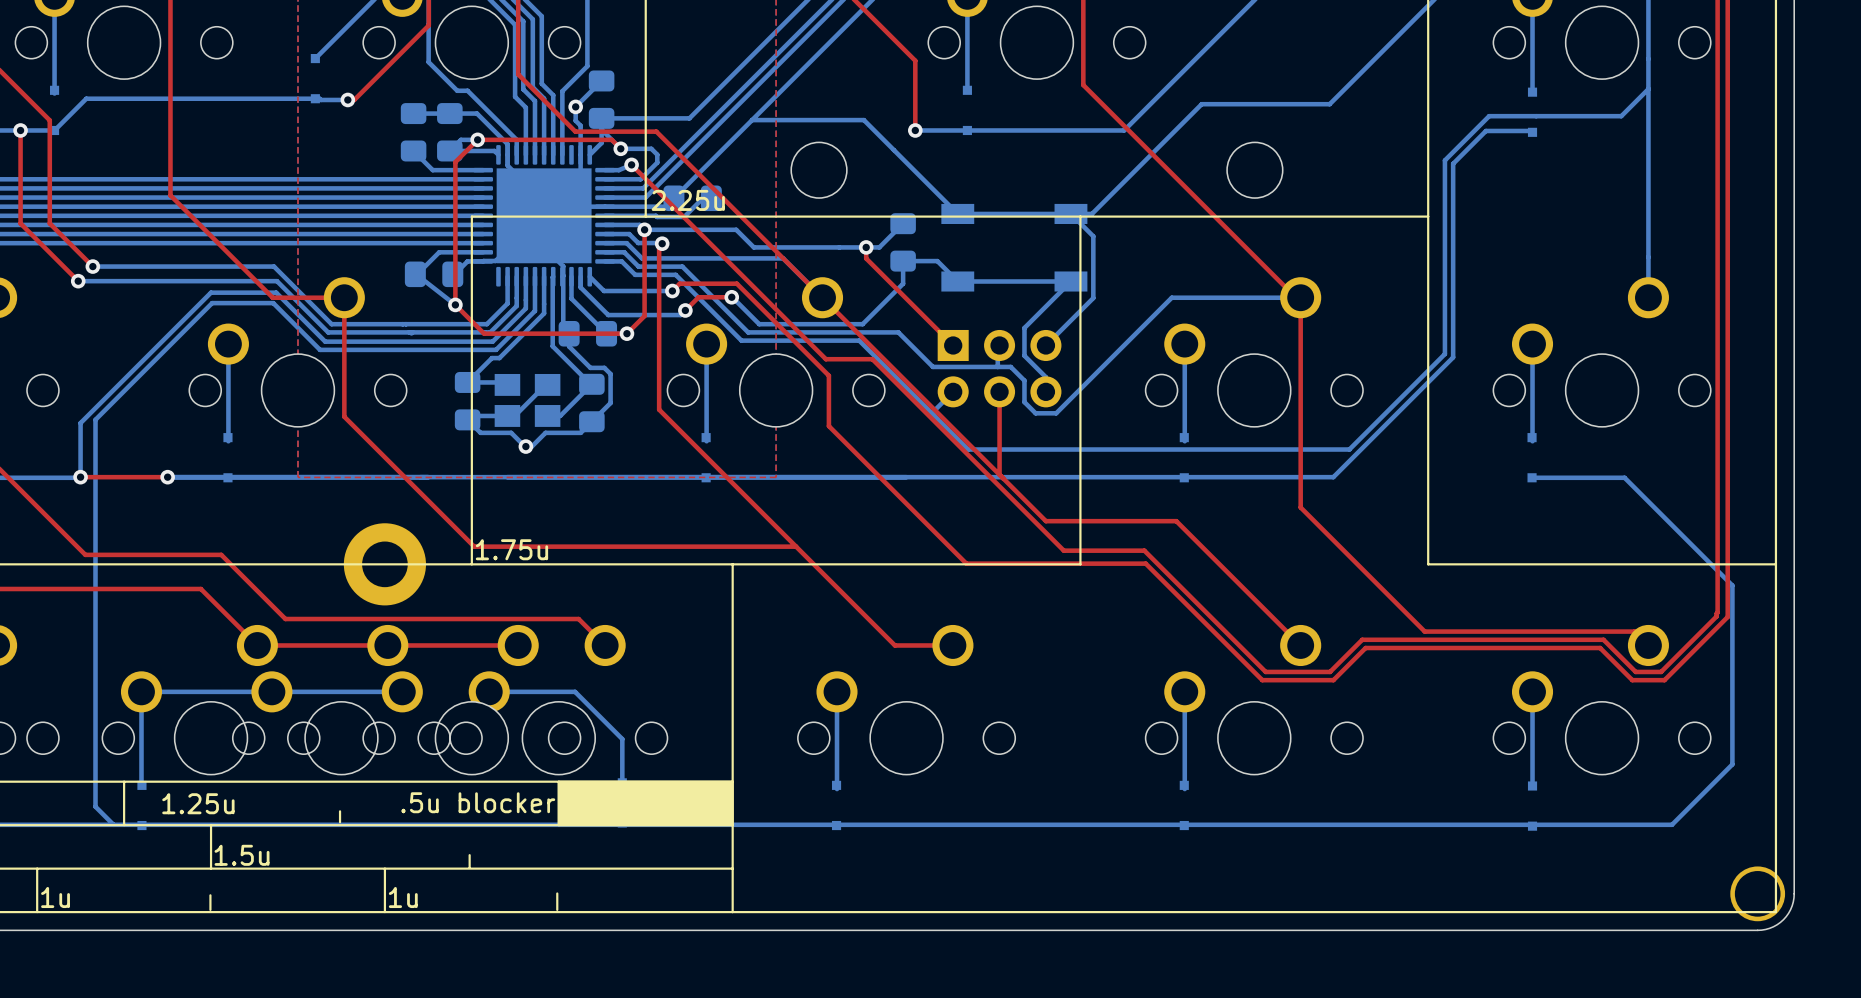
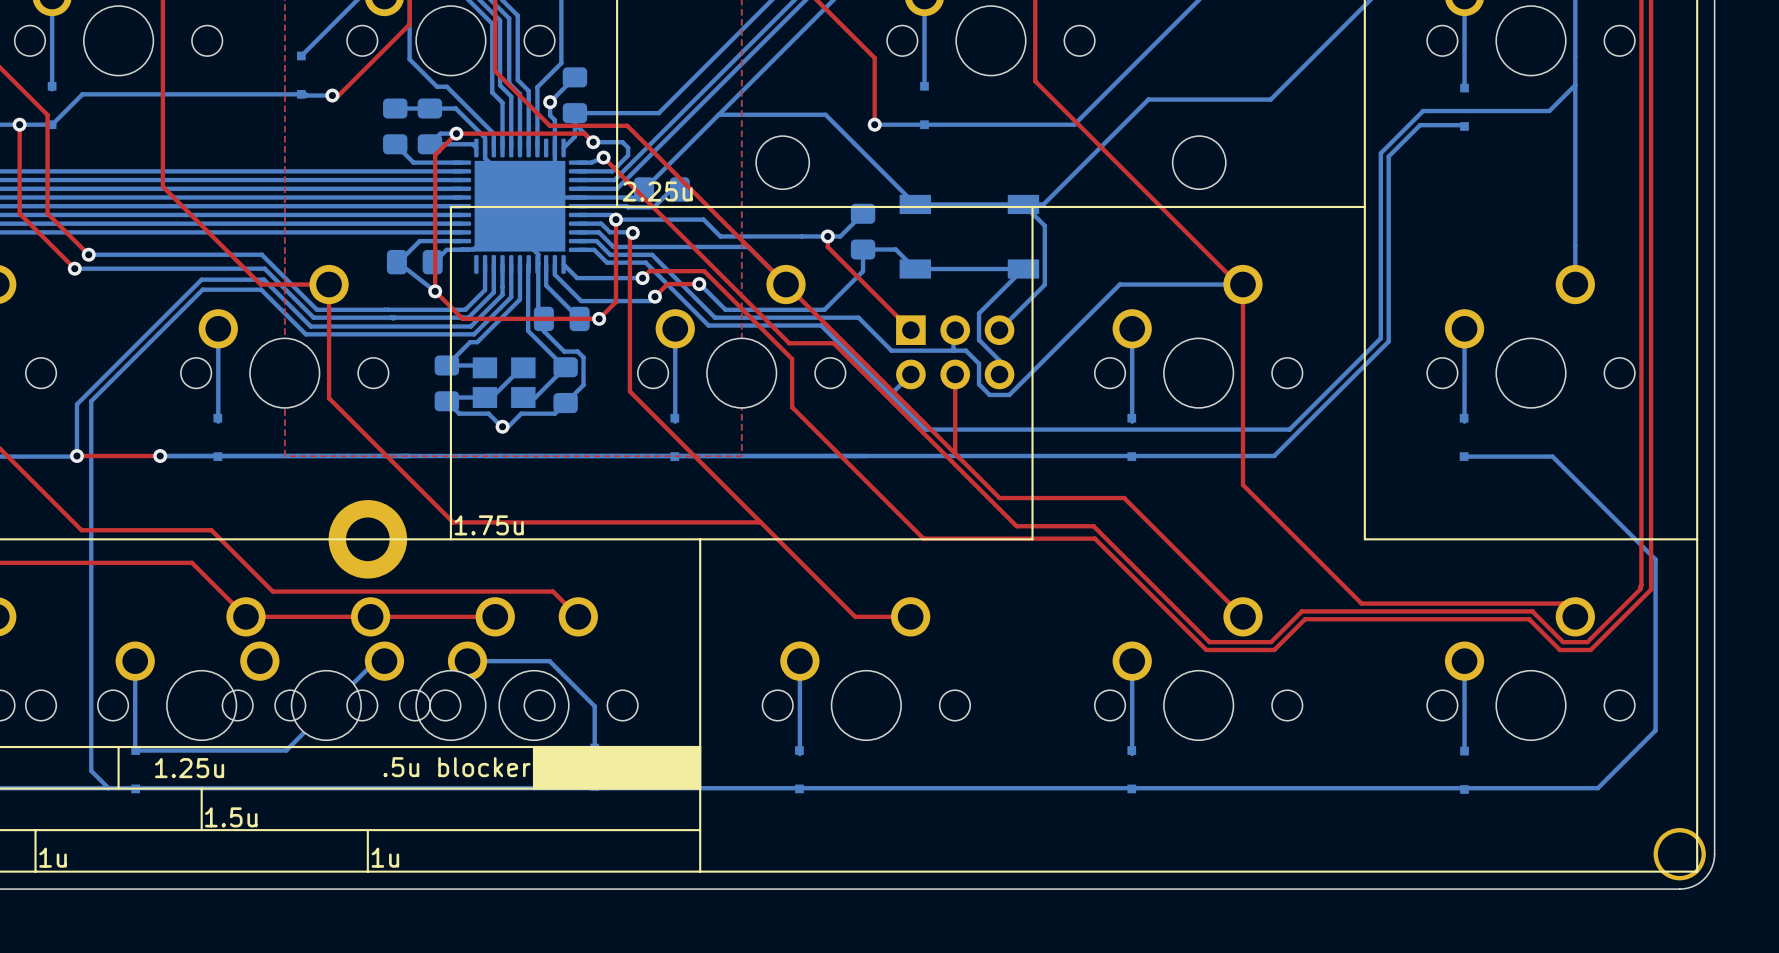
bottom track: (141, 691) (271, 691) -> none
bottom track: (271, 691) (402, 691) -> (135, 750) (286, 750) (375, 661) (384, 661)
line: (340, 811) (340, 822) -> none
line: (469, 855) (469, 867) -> none
line: (557, 893) (557, 909) -> none
line: (210, 895) (210, 909) -> none

